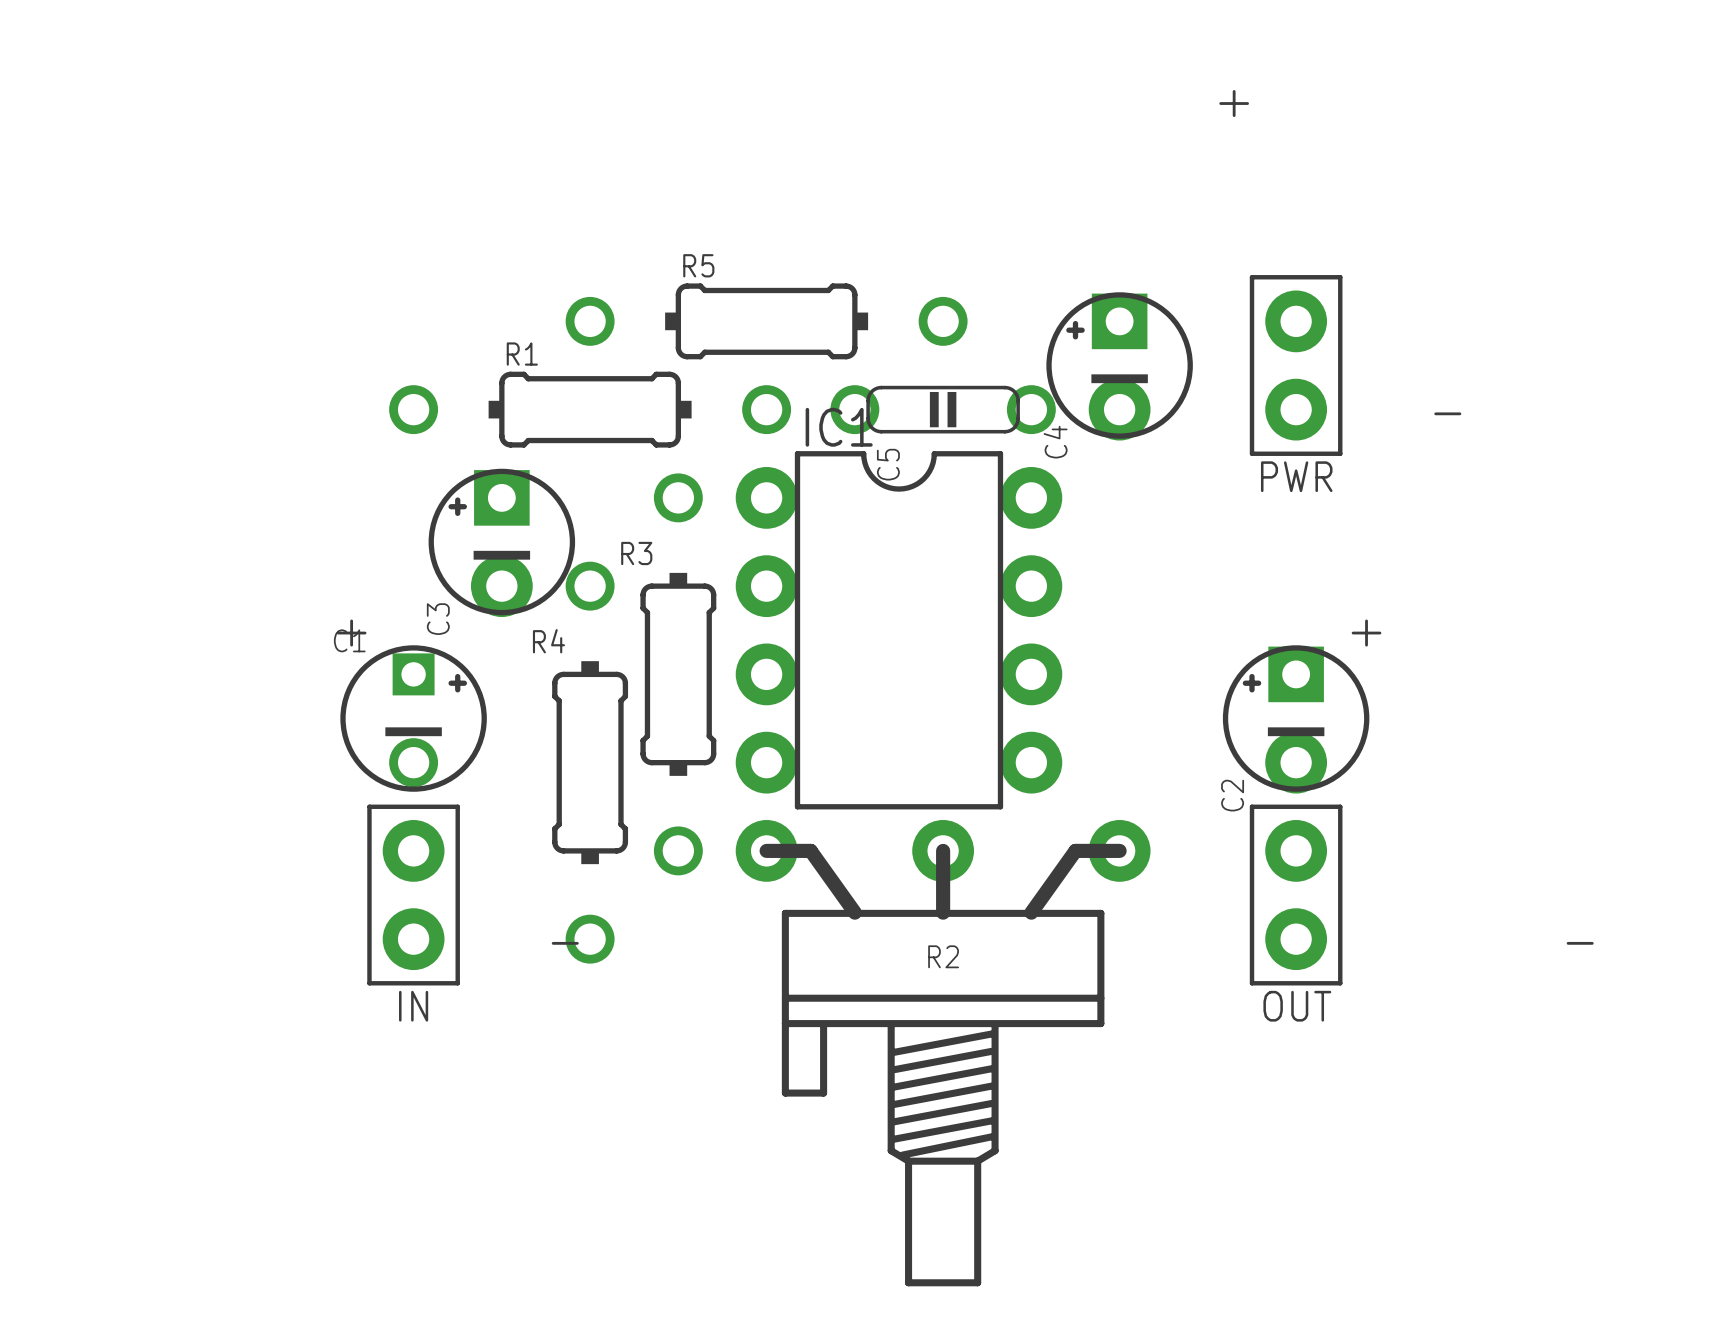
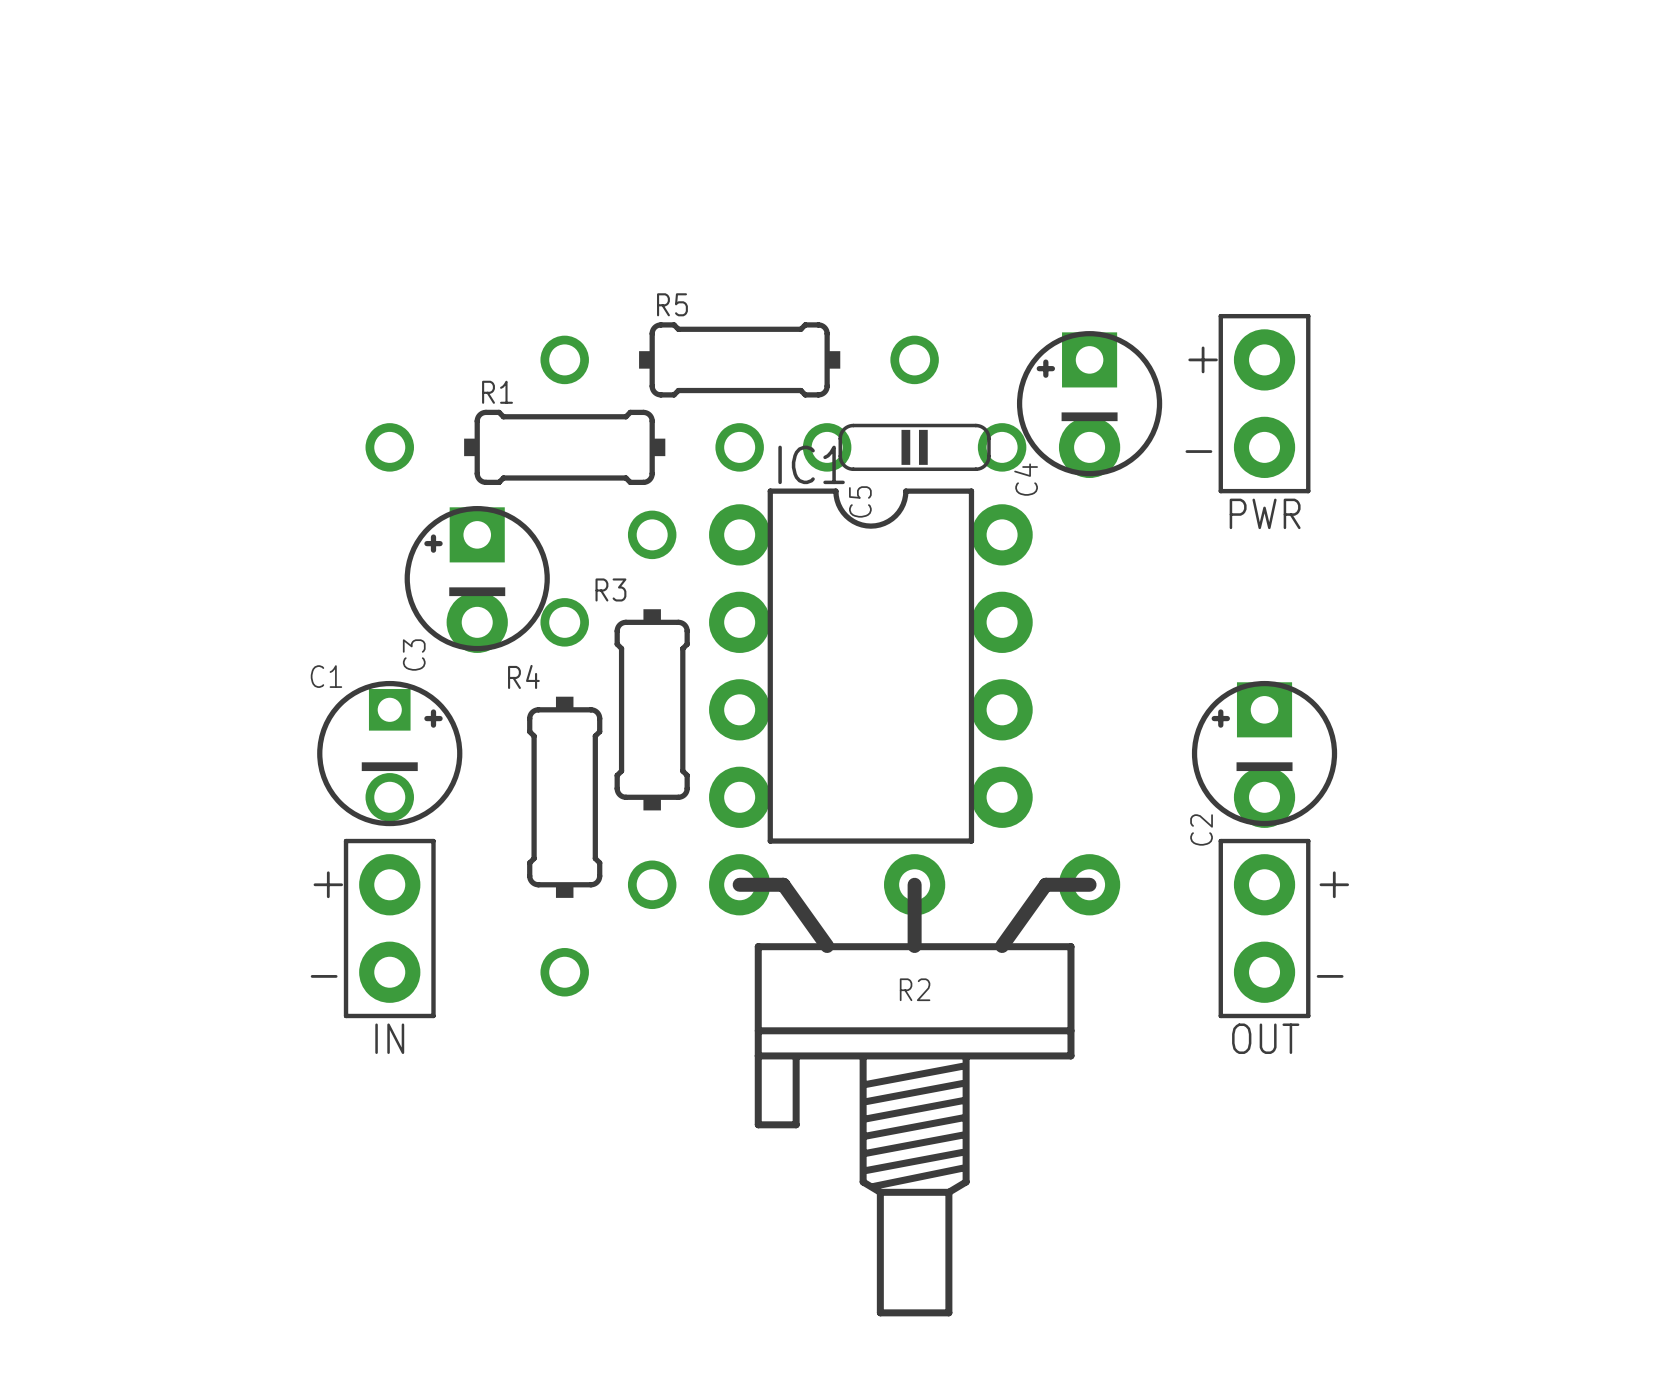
PWR footprint: [1249, 275, 1343, 456] -> [1218, 313, 1311, 494]
IN footprint: [367, 804, 460, 986] -> [343, 838, 436, 1019]
OUT footprint: [1249, 804, 1343, 986] -> [1218, 838, 1311, 1019]

